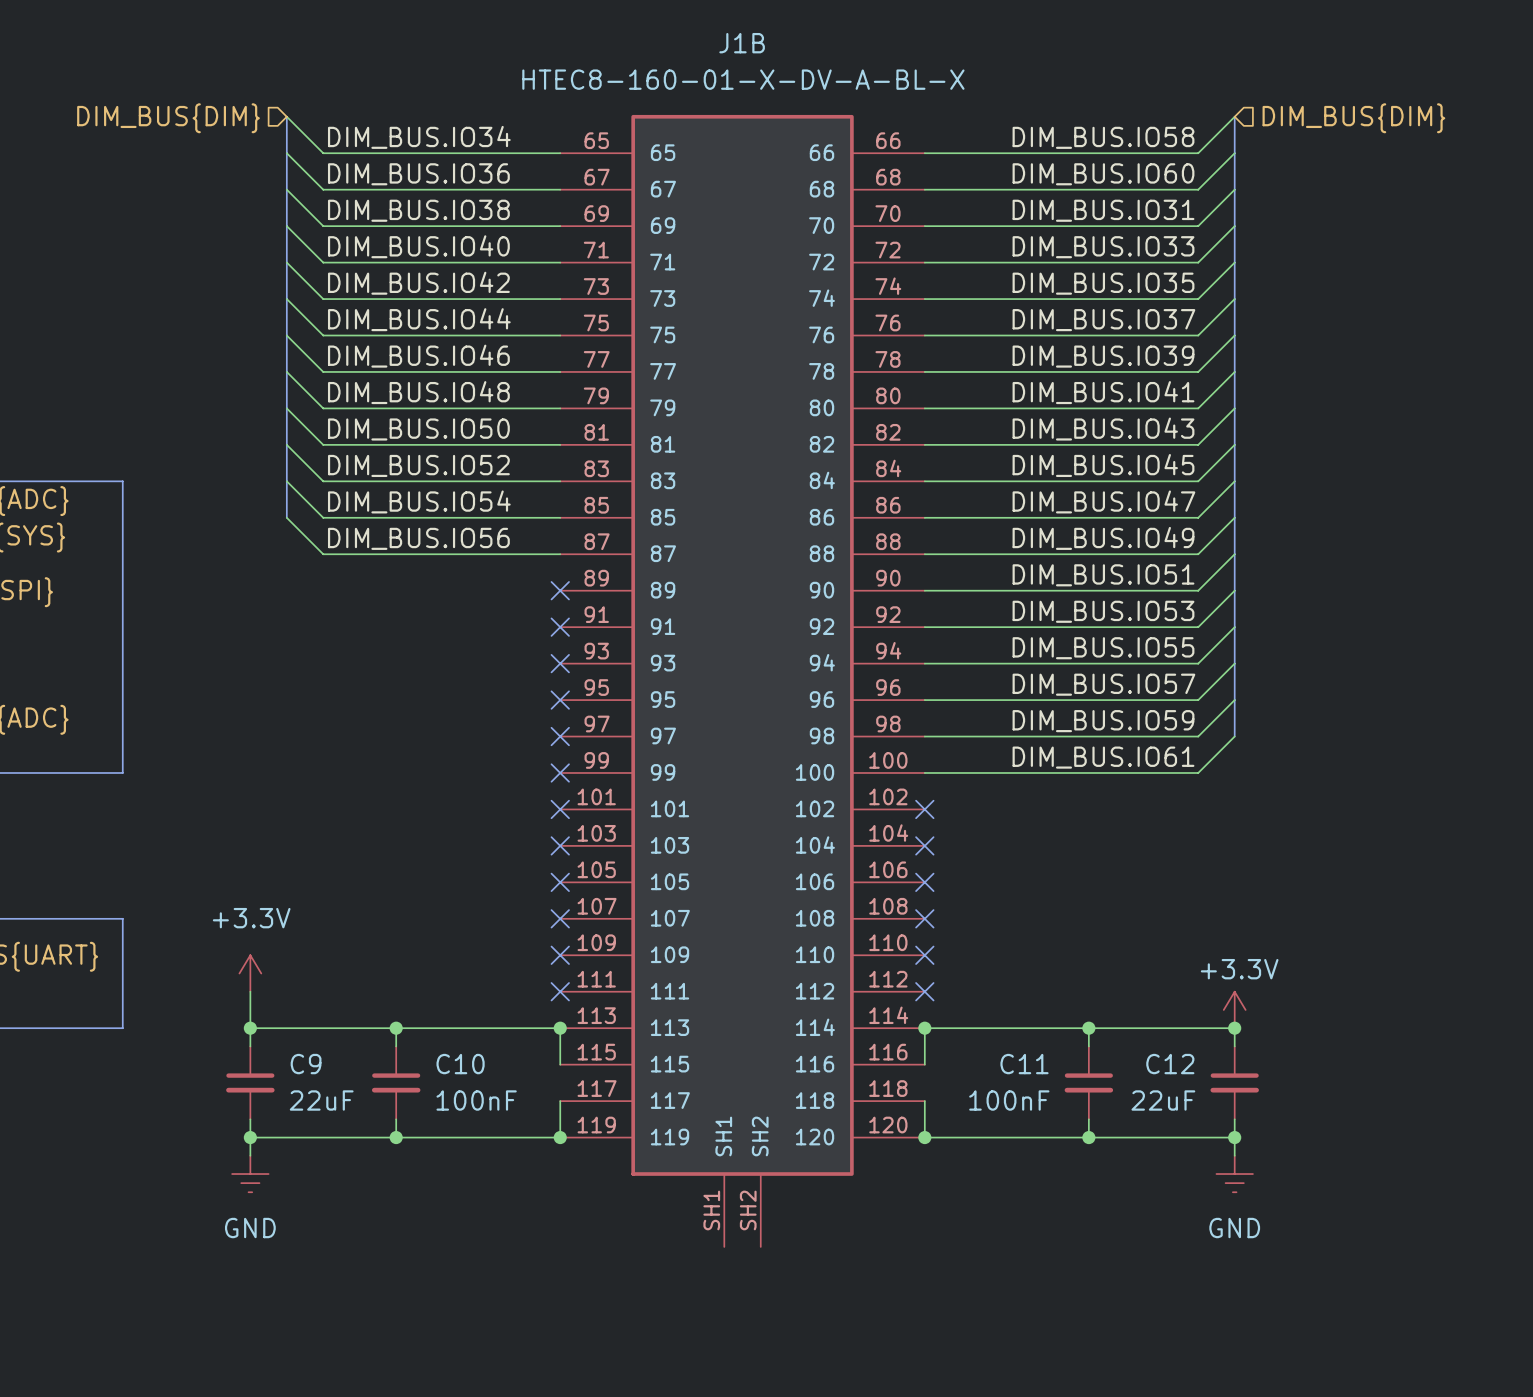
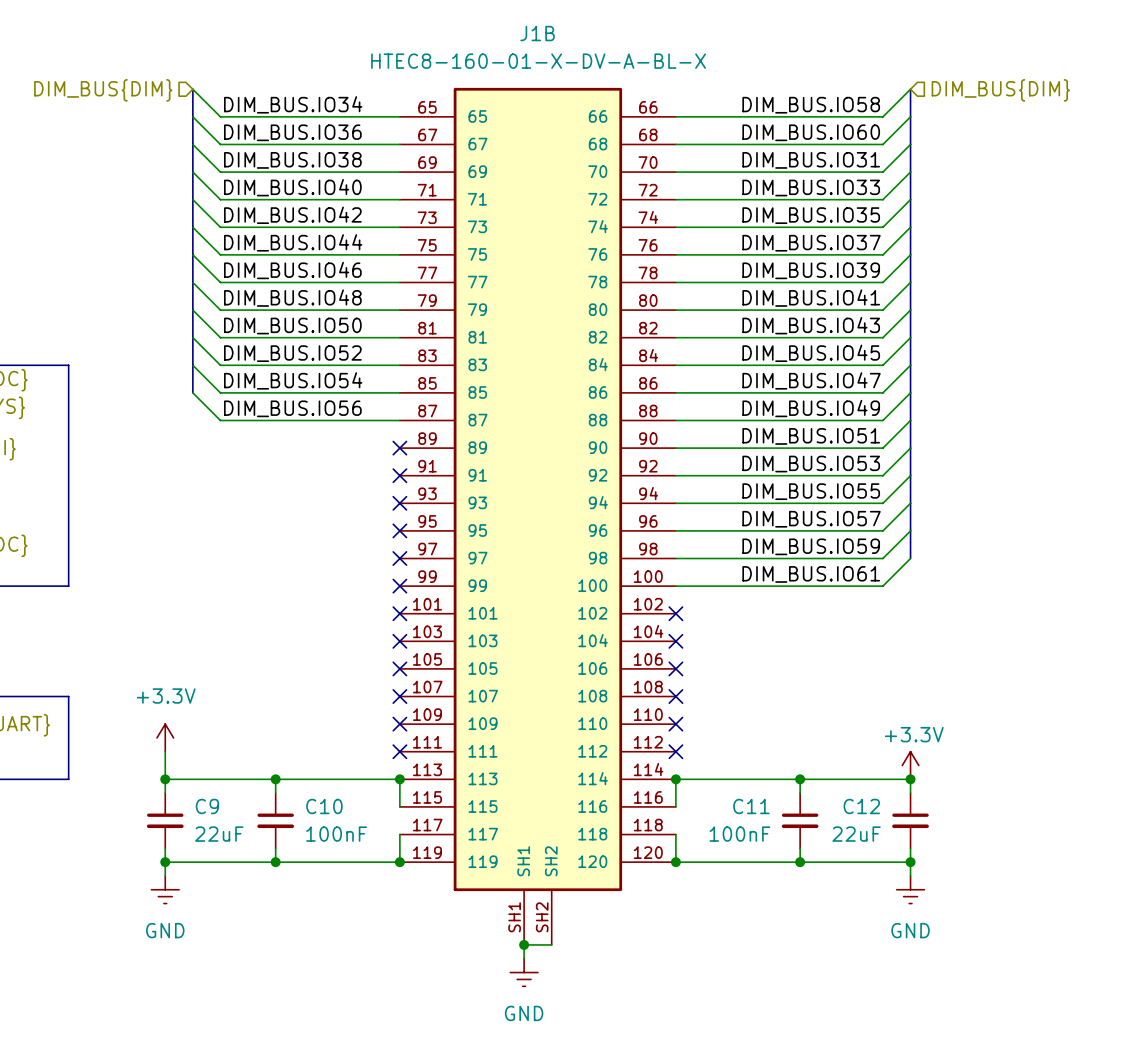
junction: none -> (524, 944)
wire: none -> (551, 944) (524, 944) (524, 958)
power symbol: none -> GND (524, 972)

